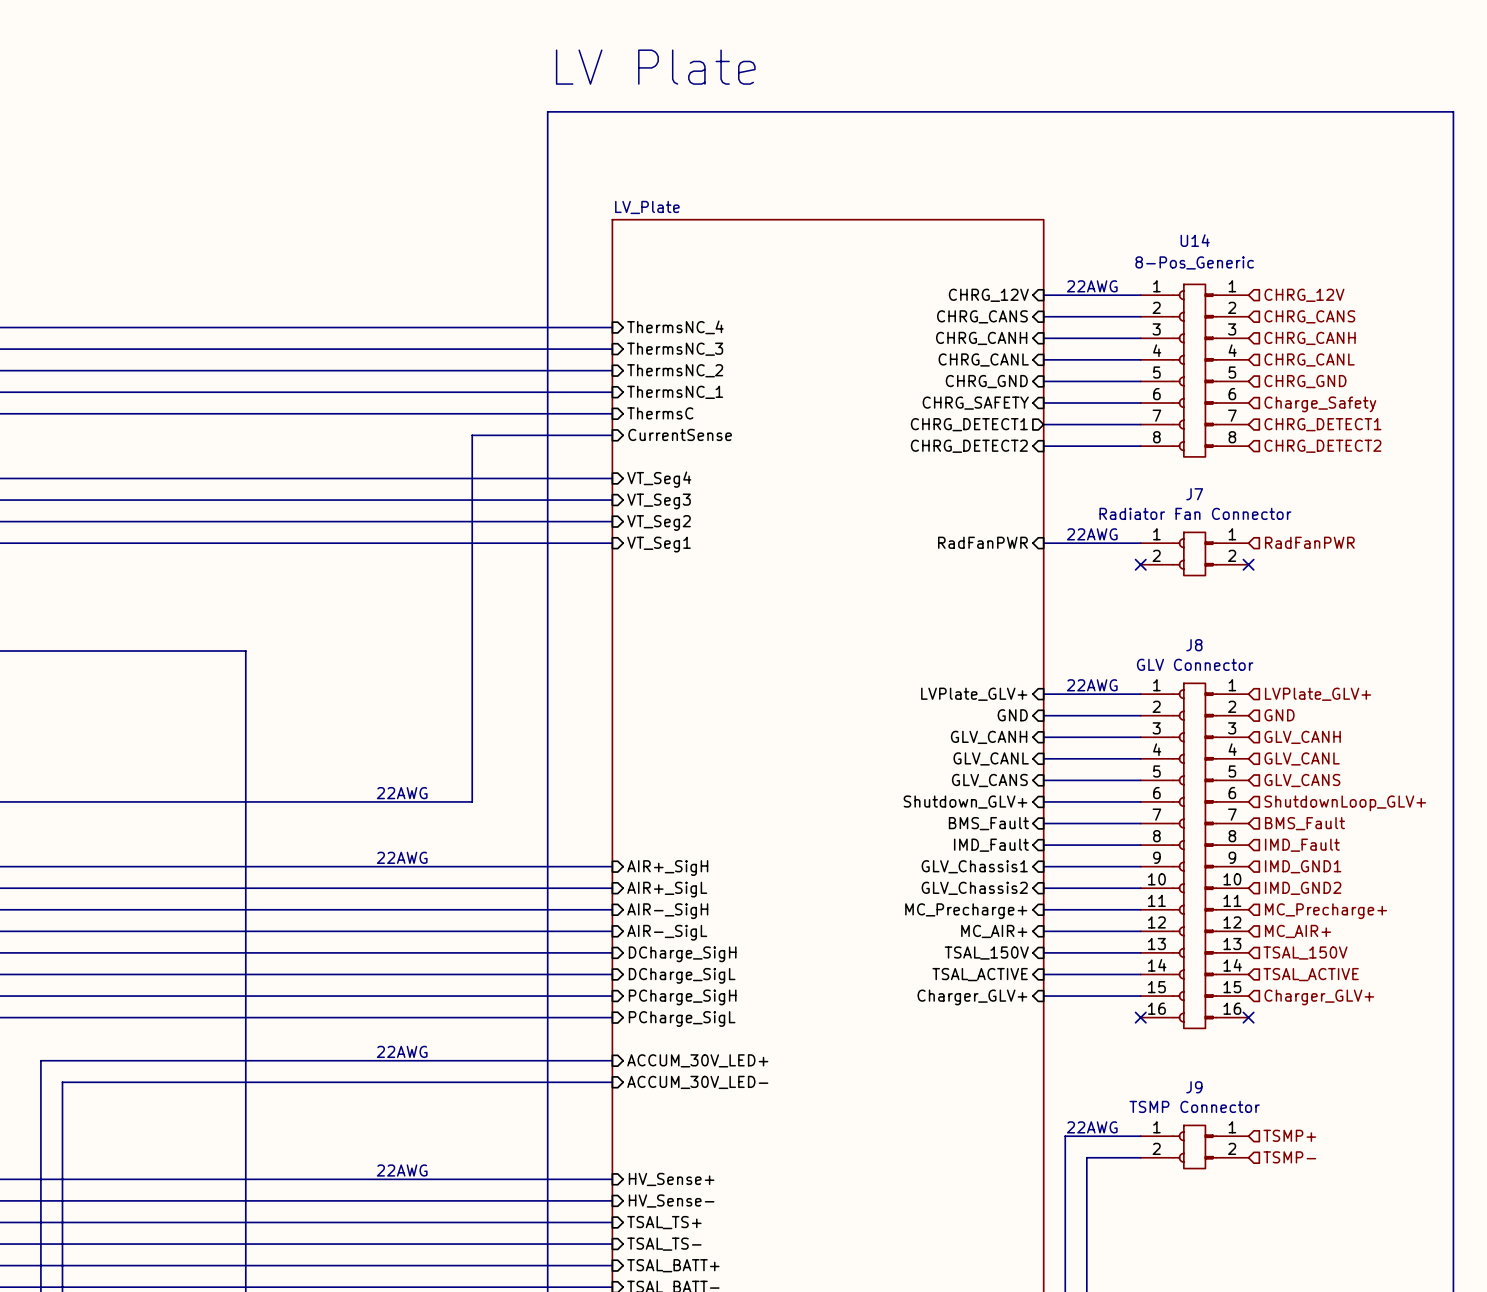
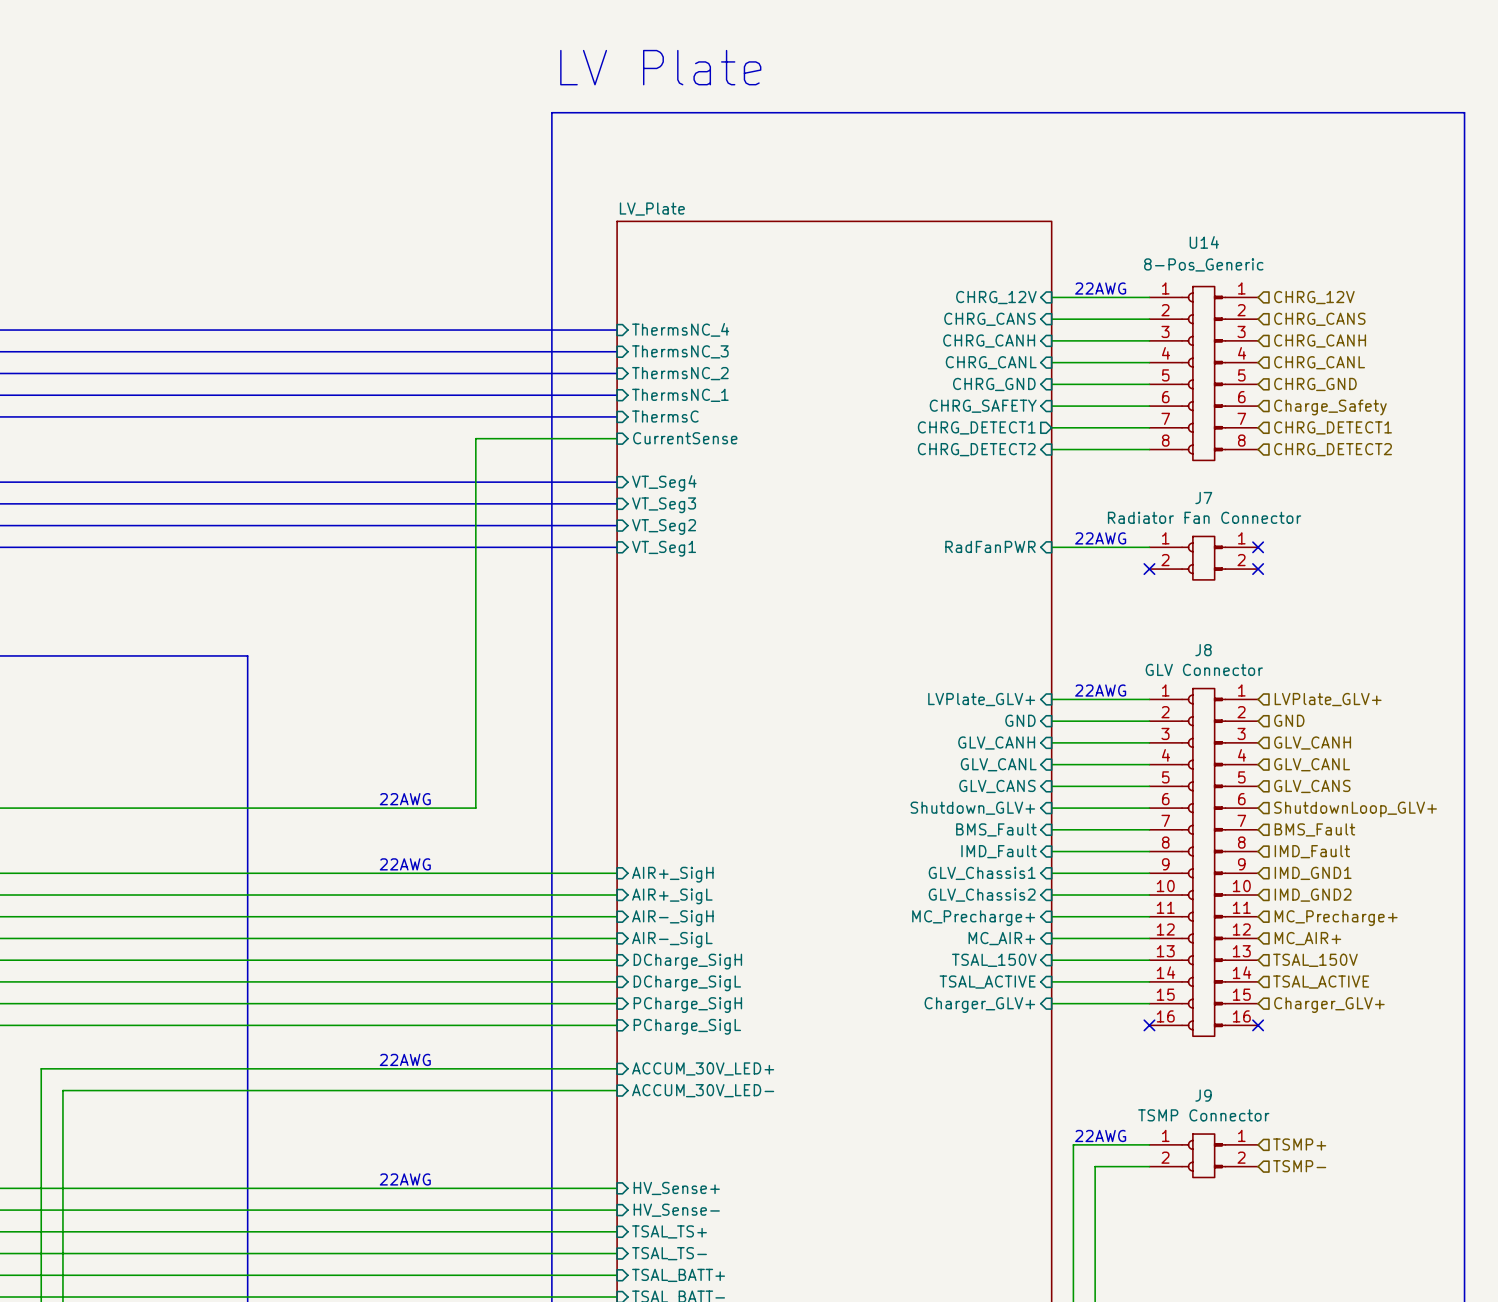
hierarchical label: RadFanPWR (1309, 542) -> none
no-connect mark: none -> (1258, 547)

